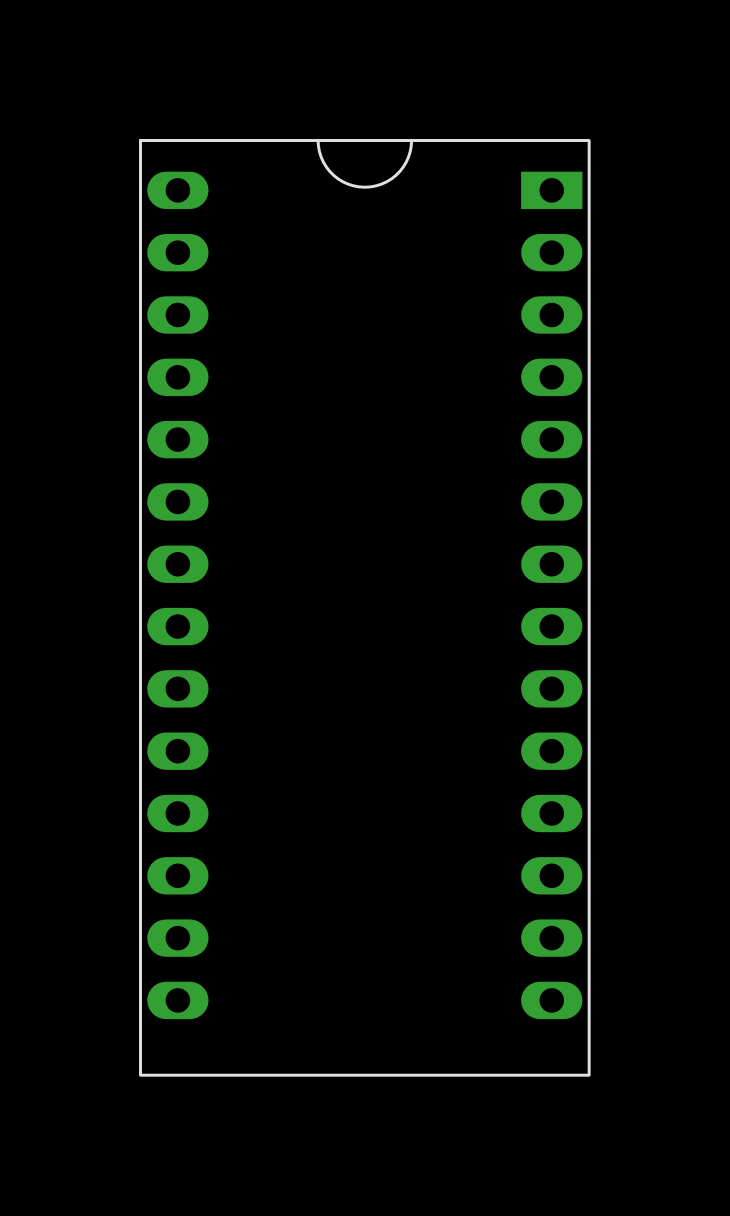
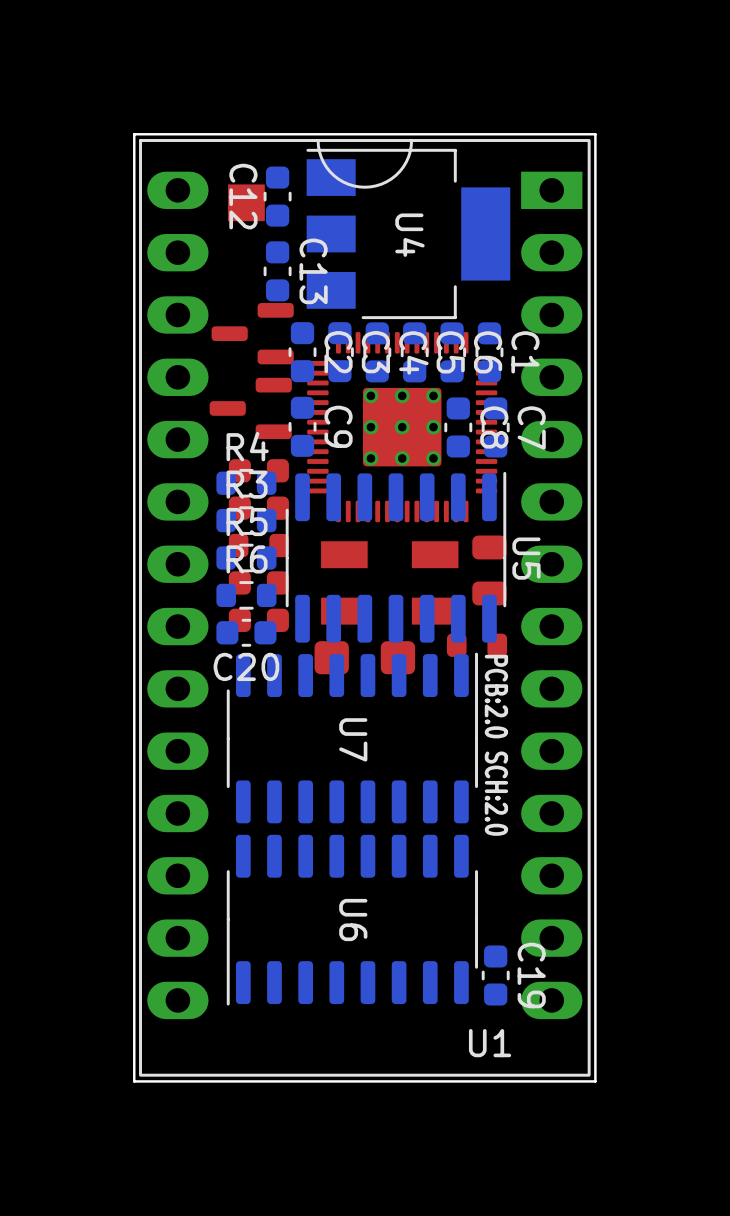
board edge: none -> (595, 134) (134, 134) (134, 1081) (595, 1081) (595, 134)
C12: none -> (277, 196)
part: none -> (246, 202)
U4: none -> (408, 233)
C13: none -> (277, 271)
part: none -> (252, 333)
C2: none -> (302, 352)
C3: none -> (339, 352)
C4: none -> (377, 352)
C5: none -> (414, 352)
C6: none -> (452, 352)
C1: none -> (489, 352)
part: none -> (250, 408)
C9: none -> (302, 426)
part: none -> (402, 427)
C8: none -> (458, 427)
C7: none -> (495, 427)
part: none -> (258, 470)
R4: none -> (246, 483)
part: none -> (258, 508)
R3: none -> (246, 520)
part: none -> (258, 545)
U5: none -> (395, 557)
R5: none -> (246, 558)
part: none -> (489, 570)
part: none -> (258, 582)
part: none -> (389, 582)
R6: none -> (246, 595)
part: none -> (258, 620)
C20: none -> (246, 632)
part: none -> (477, 645)
part: none -> (364, 657)
U7: none -> (352, 737)
text: none -> PCB:2.0 SCH:2.0 (496, 745)
U6: none -> (352, 920)
C19: none -> (495, 975)
U1 name: none -> U1 (490, 1043)

